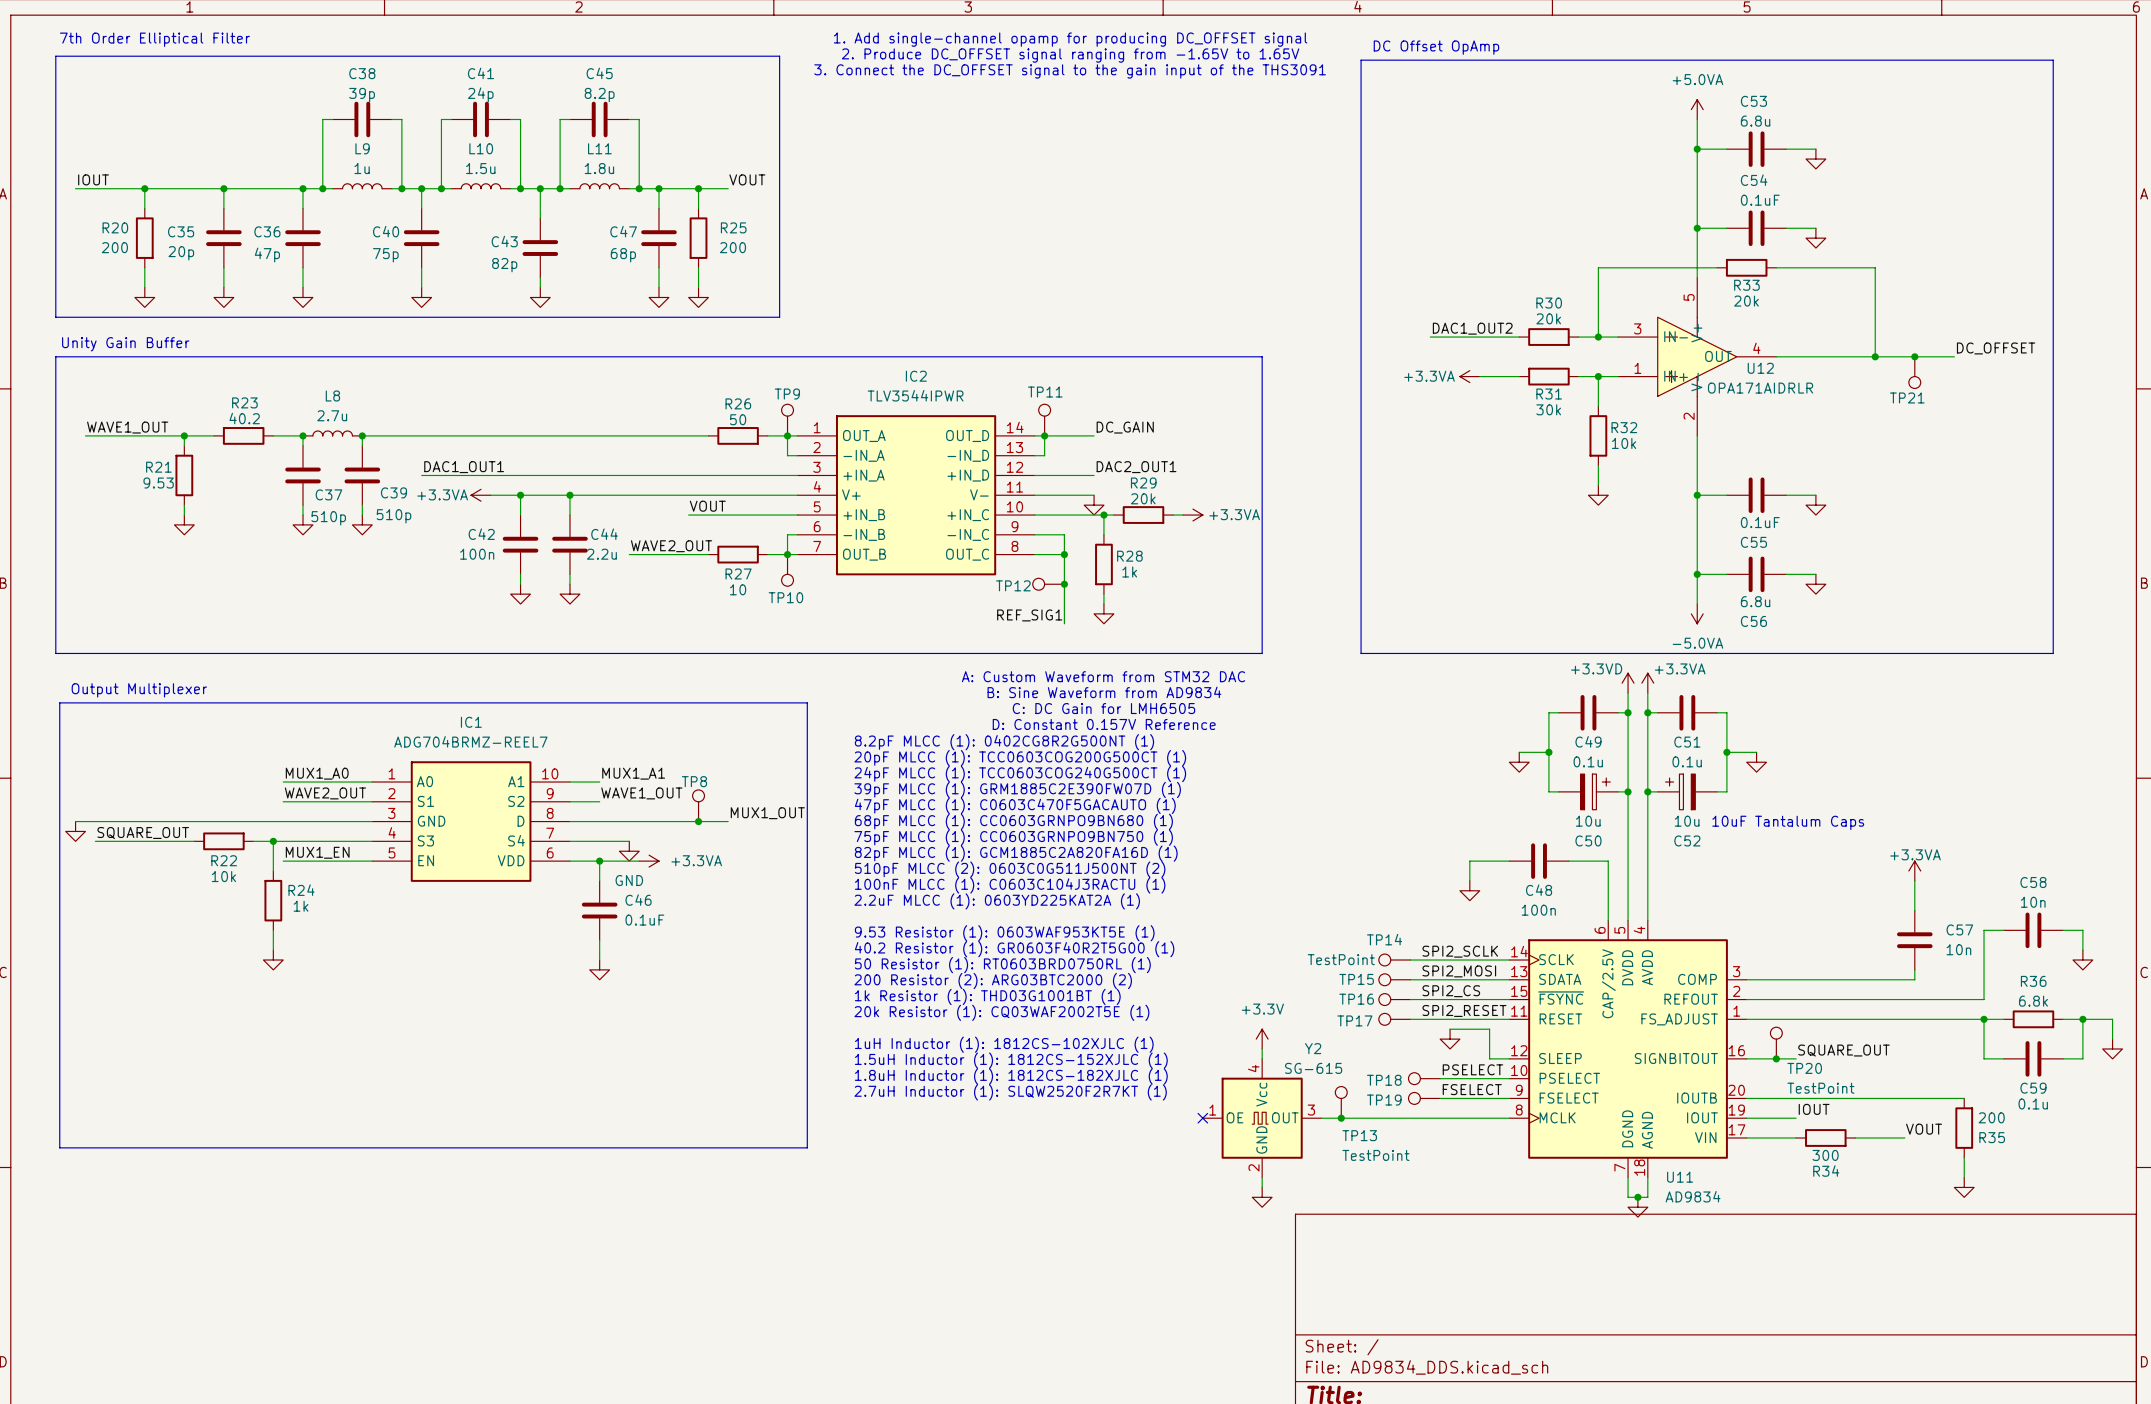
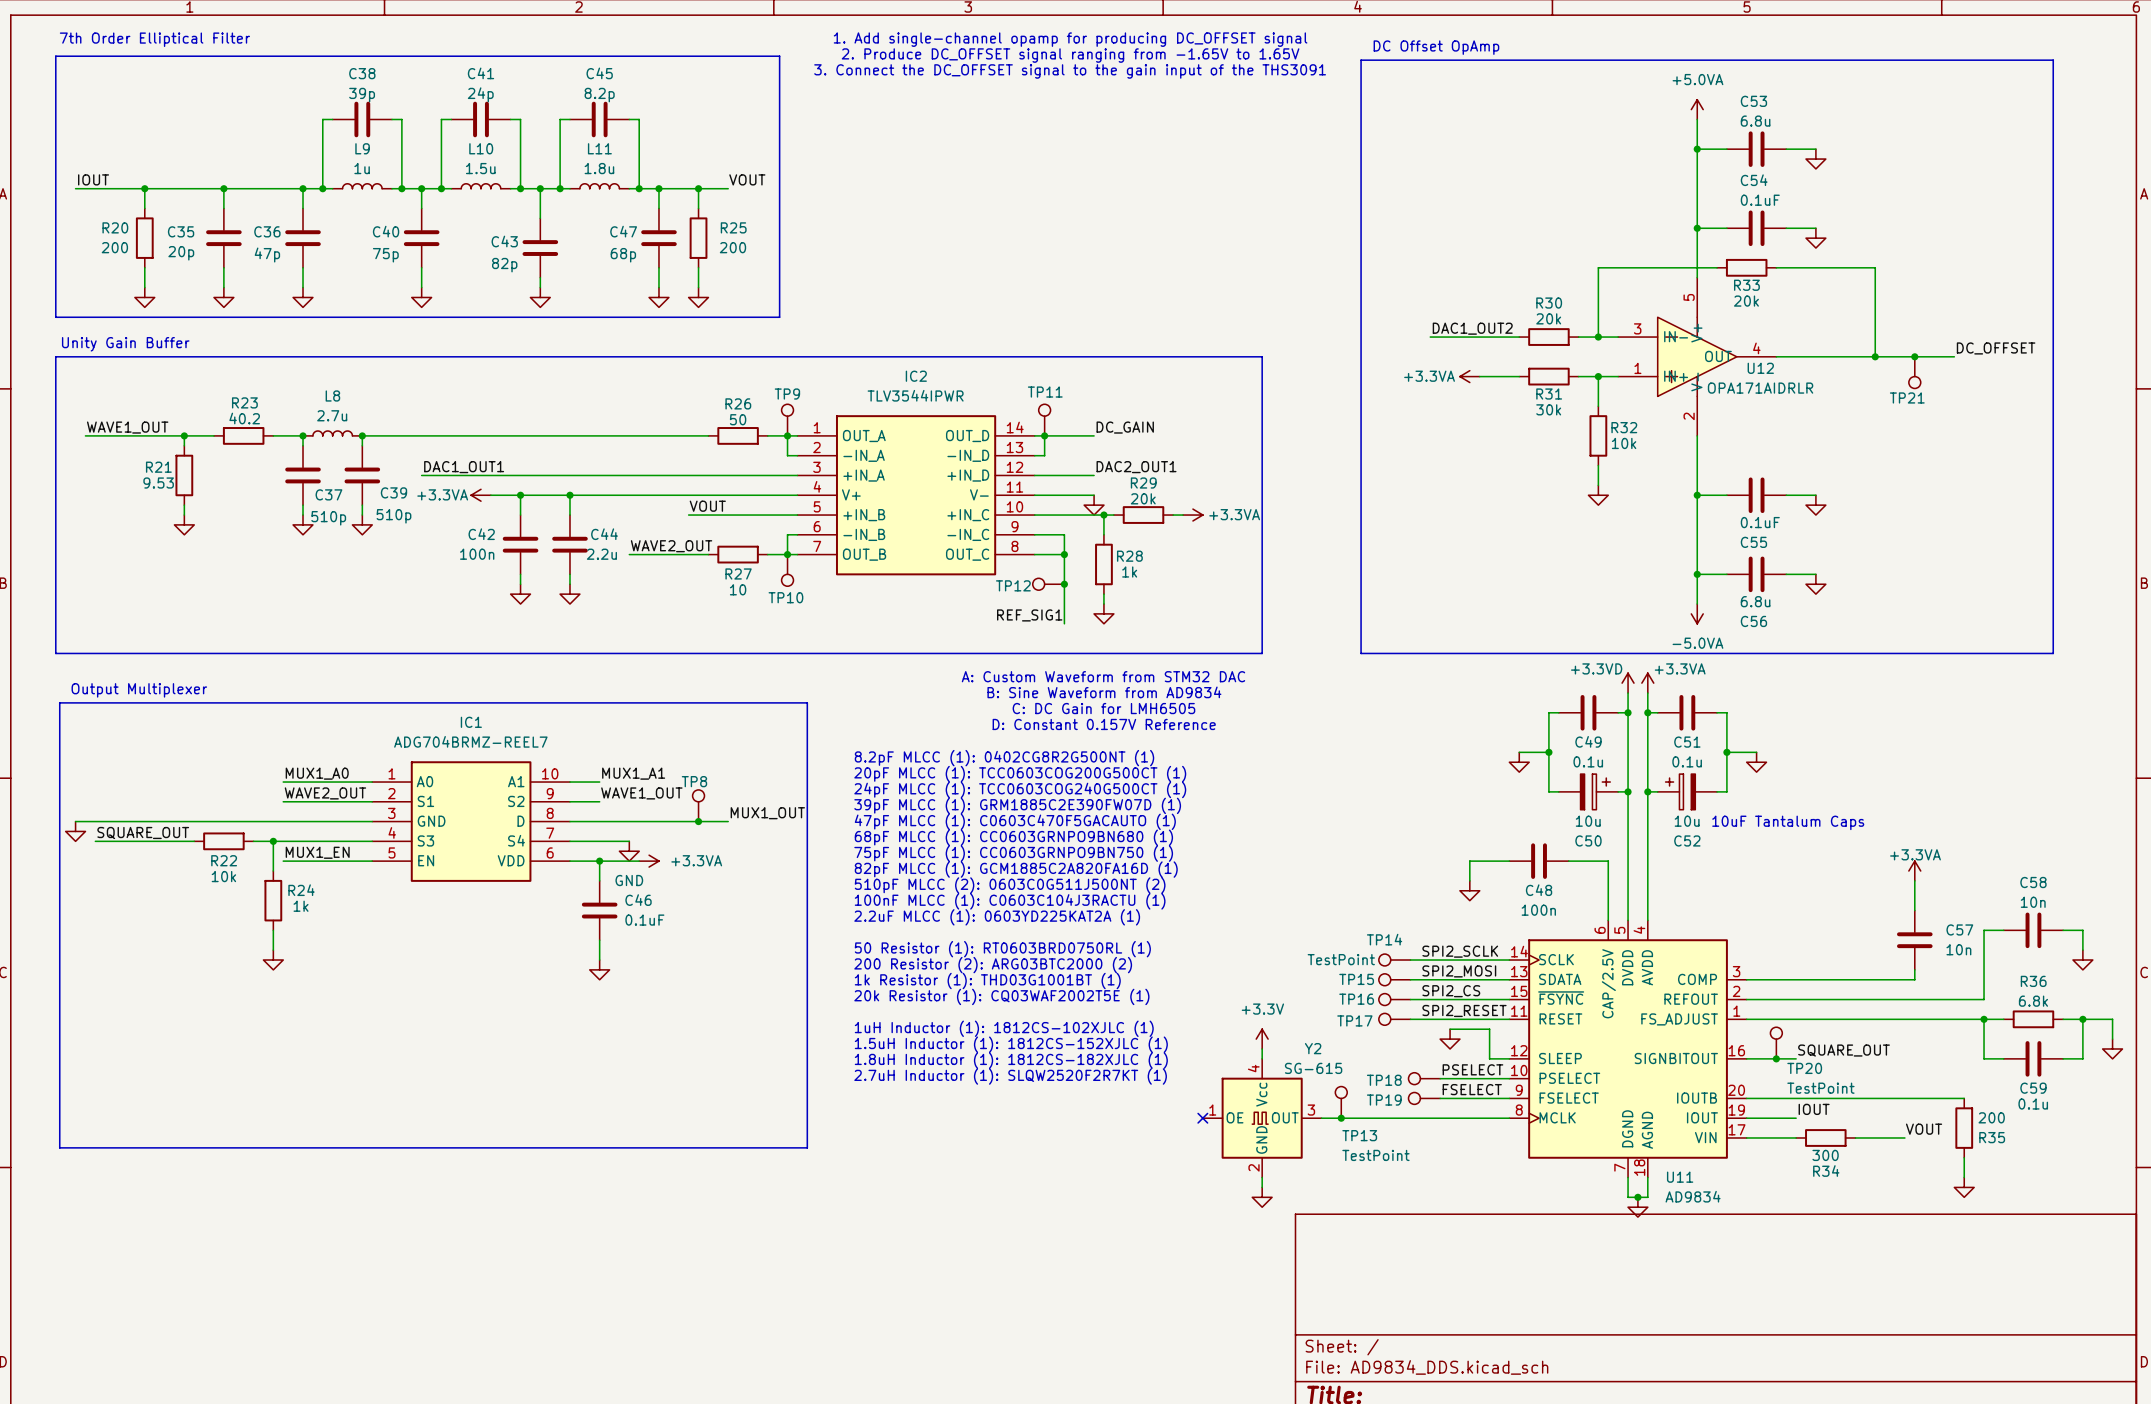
text: 8.2pF MLCC (1): 0402CG8R2G500NT (1) (1004, 742) -> none
text: 20pF MLCC (1): TCC0603COG200G500CT (1) (1020, 758) -> 8.2pF MLCC (1): 0402CG8R2G500NT (1) (1004, 758)
text: 24pF MLCC (1): TCC0603COG240G500CT (1) (1020, 774) -> 20pF MLCC (1): TCC0603COG200G500CT (1) (1020, 774)
text: 39pF MLCC (1): GRM1885C2E390FW07D (1) (1017, 789) -> 24pF MLCC (1): TCC0603COG240G500CT (1) (1020, 789)
text: 47pF MLCC (1): C0603C470F5GACAUTO (1) (1015, 805) -> 39pF MLCC (1): GRM1885C2E390FW07D (1) (1017, 805)
text: 68pF MLCC (1): CC0603GRNPO9BN680 (1) (1013, 821) -> 47pF MLCC (1): C0603C470F5GACAUTO (1) (1015, 821)
text: 75pF MLCC (1): CC0603GRNPO9BN750 (1) (1013, 837) -> 68pF MLCC (1): CC0603GRNPO9BN680 (1) (1013, 837)
text: 82pF MLCC (1): GCM1885C2A820FA16D (1) (1016, 853) -> 75pF MLCC (1): CC0603GRNPO9BN750 (1) (1013, 853)
text: 510pF MLCC (2): 0603C0G511J500NT (2) (1010, 869) -> 82pF MLCC (1): GCM1885C2A820FA16D (1) (1016, 869)
text: 100nF MLCC (1): C0603C104J3RACTU (1) (1010, 885) -> 510pF MLCC (2): 0603C0G511J500NT (2) (1010, 885)
text: 2.2uF MLCC (1): 0603YD225KAT2A (1) (997, 901) -> 100nF MLCC (1): C0603C104J3RACTU (1) (1010, 901)
text: none -> 2.2uF MLCC (1): 0603YD225KAT2A (1) (997, 917)
text: 9.53 Resistor (1): 0603WAF953KT5E (1) (1004, 933) -> none
text: 40.2 Resistor (1): GR0603F40R2T5G00 (1) (1014, 949) -> 50 Resistor (1): RT0603BRD0750RL (1) (1002, 949)
text: 50 Resistor (1): RT0603BRD0750RL (1) (1002, 965) -> 200 Resistor (2): ARG03BTC2000 (2) (993, 965)
text: 200 Resistor (2): ARG03BTC2000 (2) (993, 981) -> 1k Resistor (1): THD03G1001BT (1) (987, 981)
text: 1k Resistor (1): THD03G1001BT (1) (987, 996) -> 20k Resistor (1): CQ03WAF2002T5E (1) (1001, 996)
text: 20k Resistor (1): CQ03WAF2002T5E (1) (1001, 1012) -> none
text: none -> 1uH Inductor (1): 1812CS-102XJLC (1) (1004, 1028)
text: 1uH Inductor (1): 1812CS-102XJLC (1) (1004, 1044) -> 1.5uH Inductor (1): 1812CS-152XJLC (1) (1011, 1044)
text: 1.5uH Inductor (1): 1812CS-152XJLC (1) (1011, 1060) -> 1.8uH Inductor (1): 1812CS-182XJLC (1) (1011, 1060)
text: 1.8uH Inductor (1): 1812CS-182XJLC (1) (1011, 1076) -> 2.7uH Inductor (1): SLQW2520F2R7KT (1) (1010, 1076)
text: 2.7uH Inductor (1): SLQW2520F2R7KT (1) (1010, 1092) -> none

